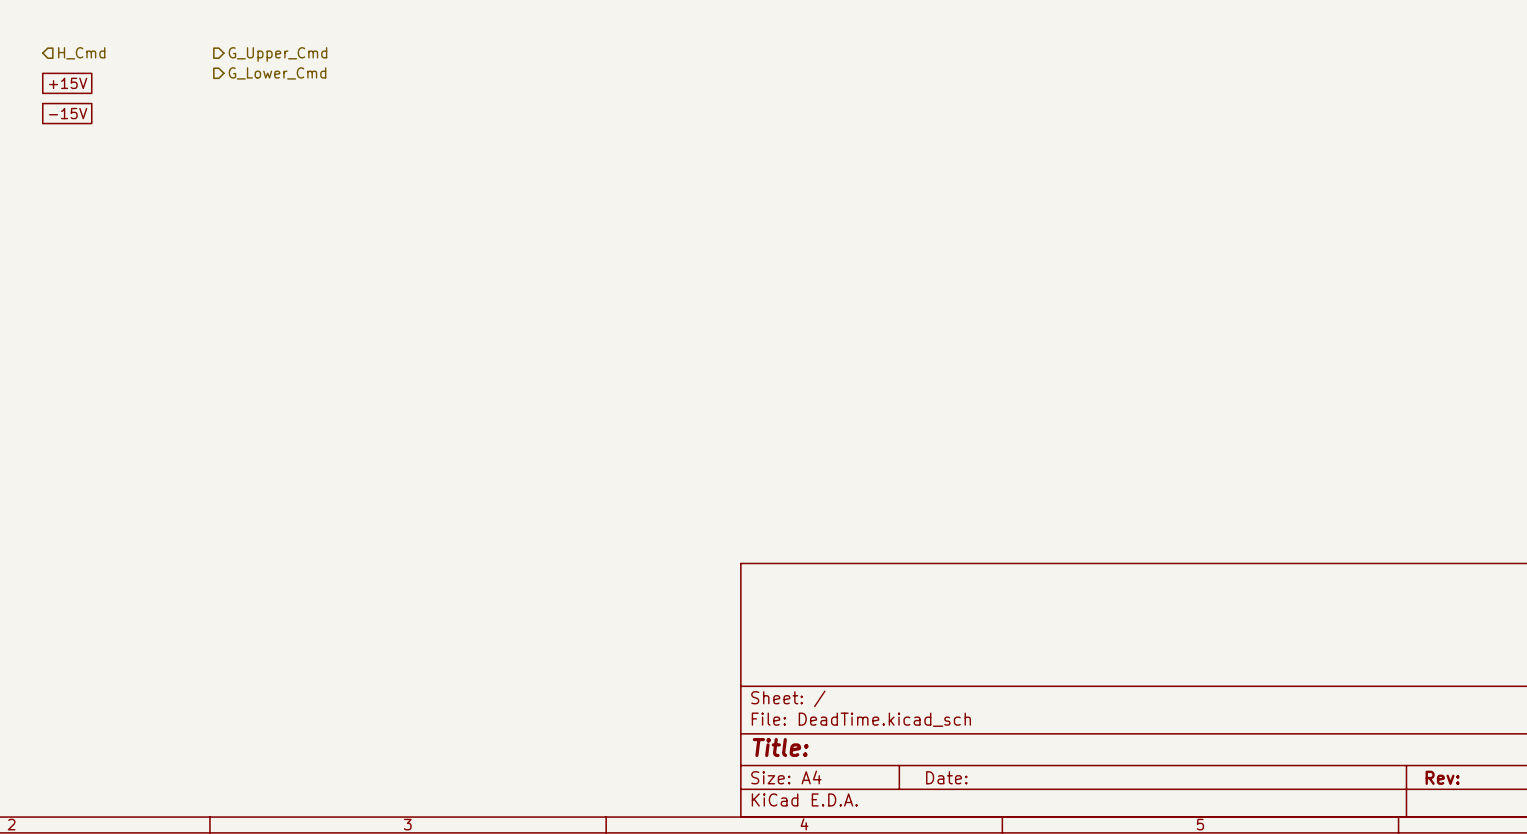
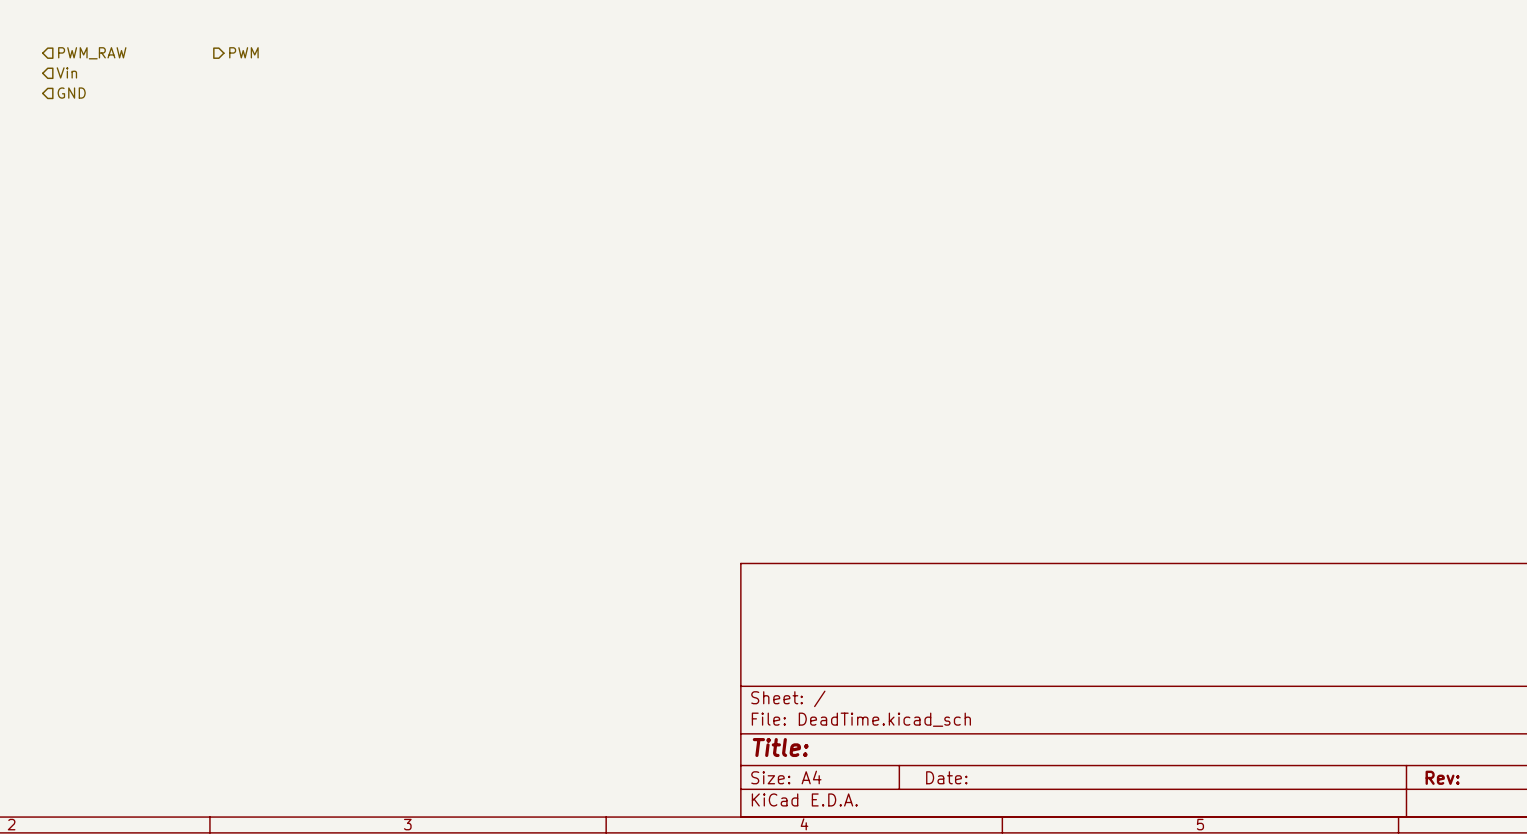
hierarchical label: H_Cmd (81, 53) -> PWM_RAW (92, 53)
hierarchical label: G_Upper_Cmd (277, 54) -> PWM (243, 52)
hierarchical label: none -> Vin (66, 72)
hierarchical label: G_Lower_Cmd (277, 73) -> none
global label: +15V (68, 83) -> none
hierarchical label: none -> GND (71, 93)
global label: -15V (68, 113) -> none

